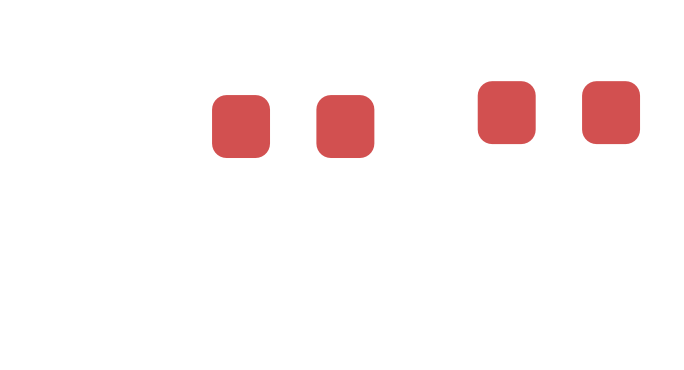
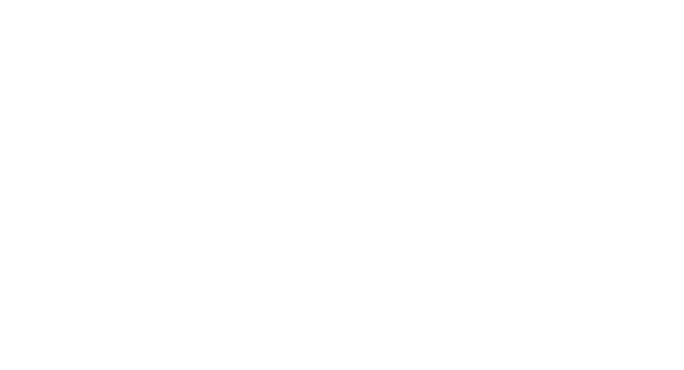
part: (558, 112) -> none
part: (293, 126) -> none

